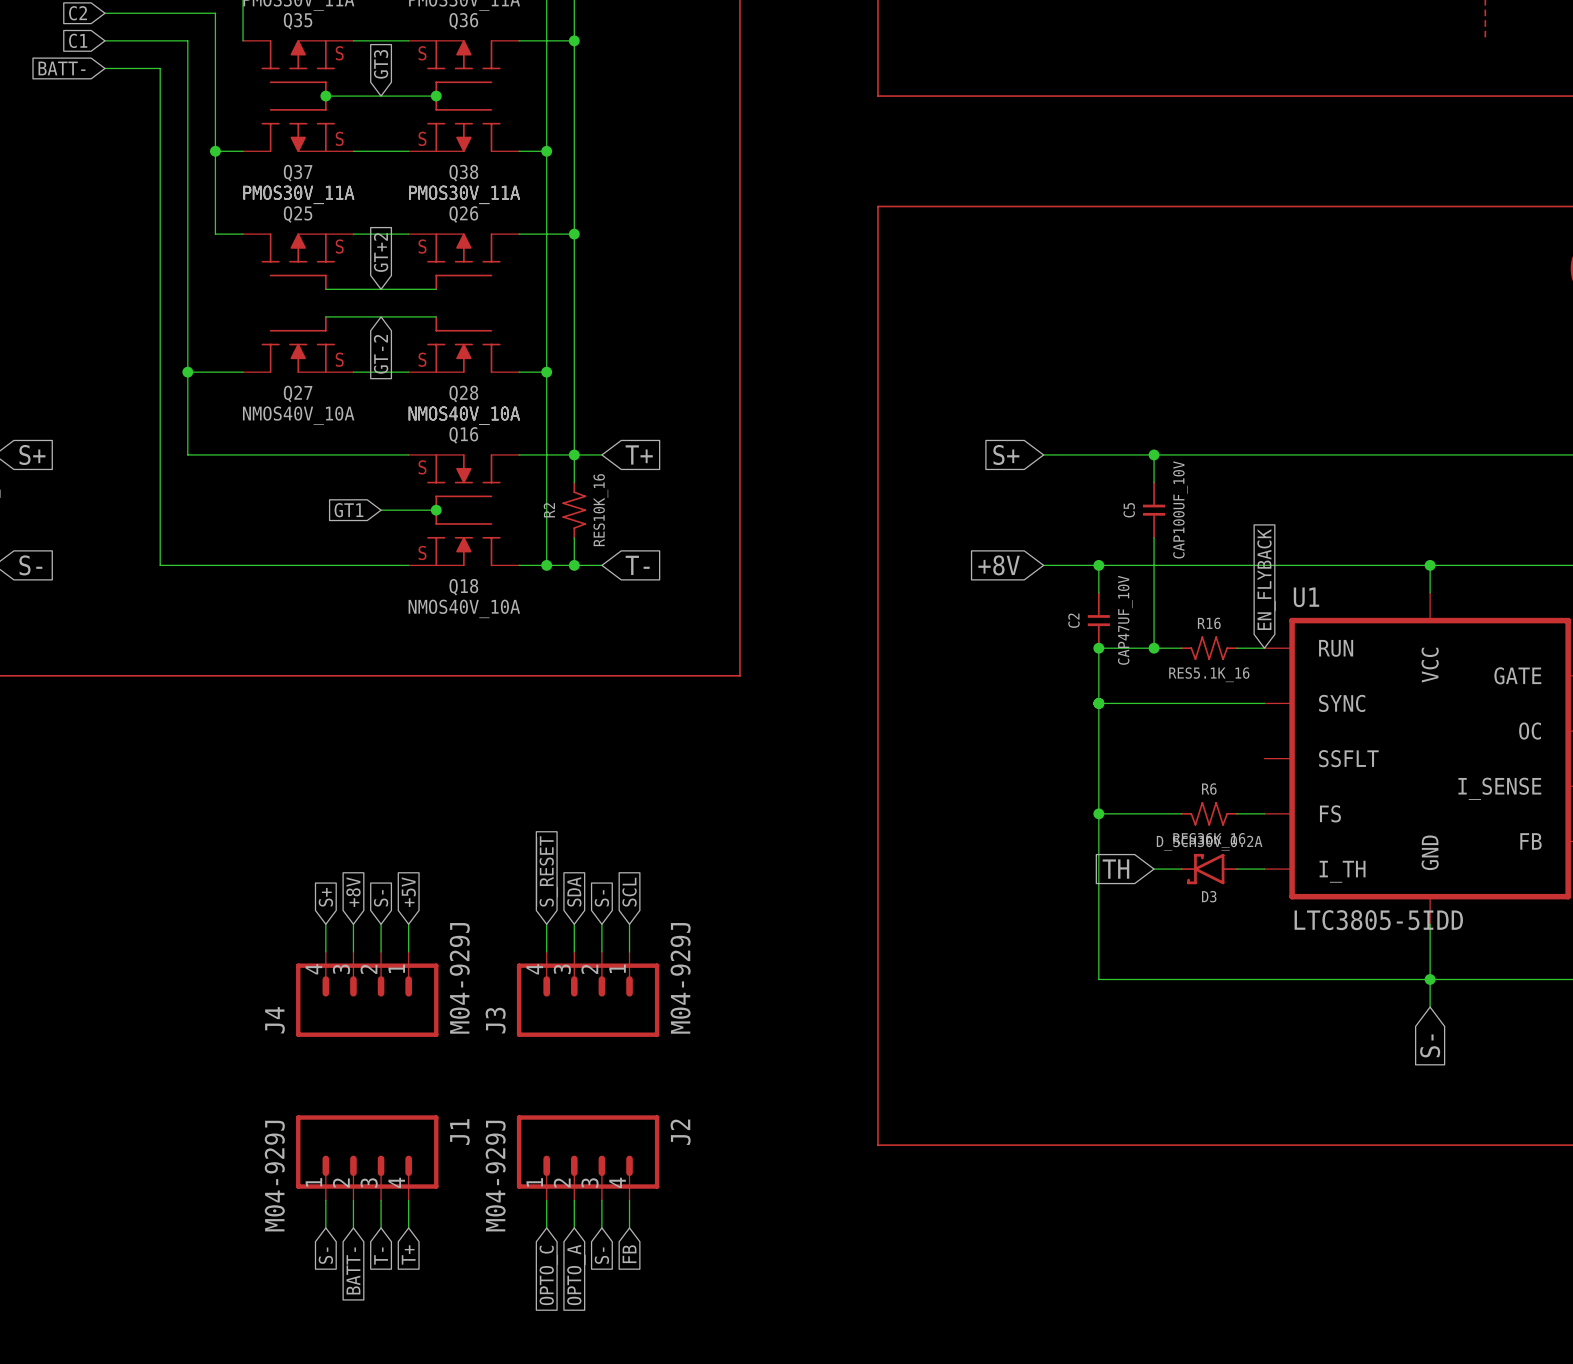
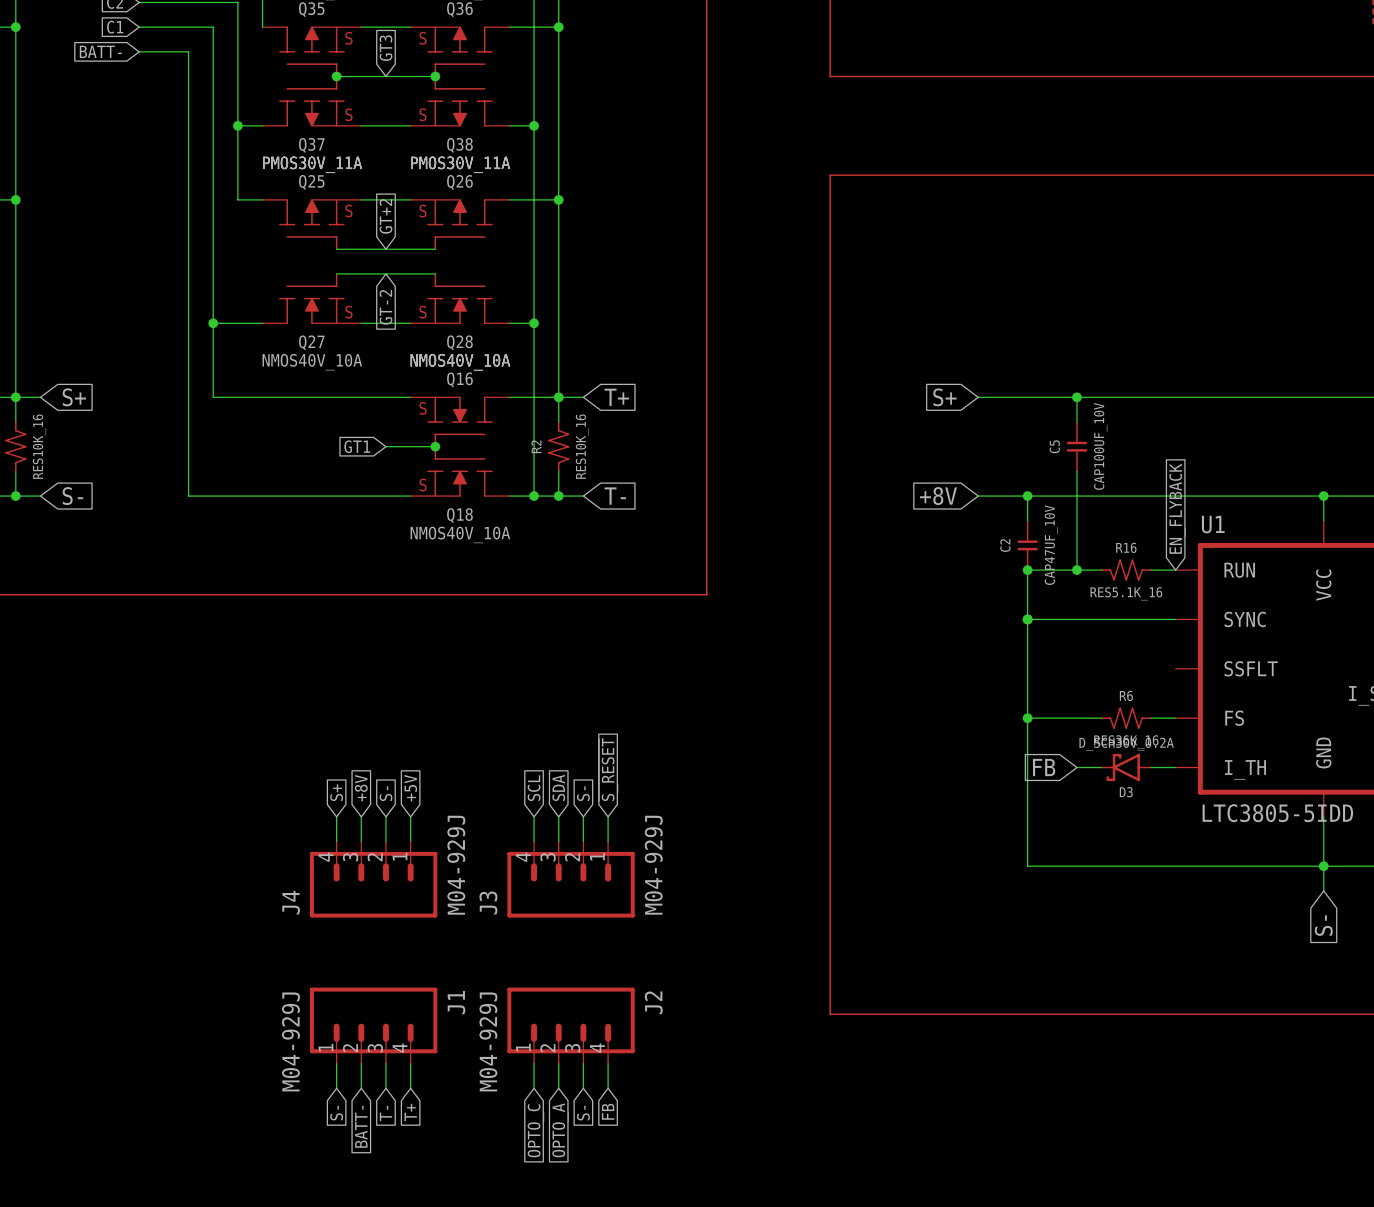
global label: TH (1115, 869) -> FB (1044, 767)
global label: ~{S_RESET} (547, 871) -> SCL (534, 788)
global label: SCL (629, 892) -> ~{S_RESET} (608, 769)

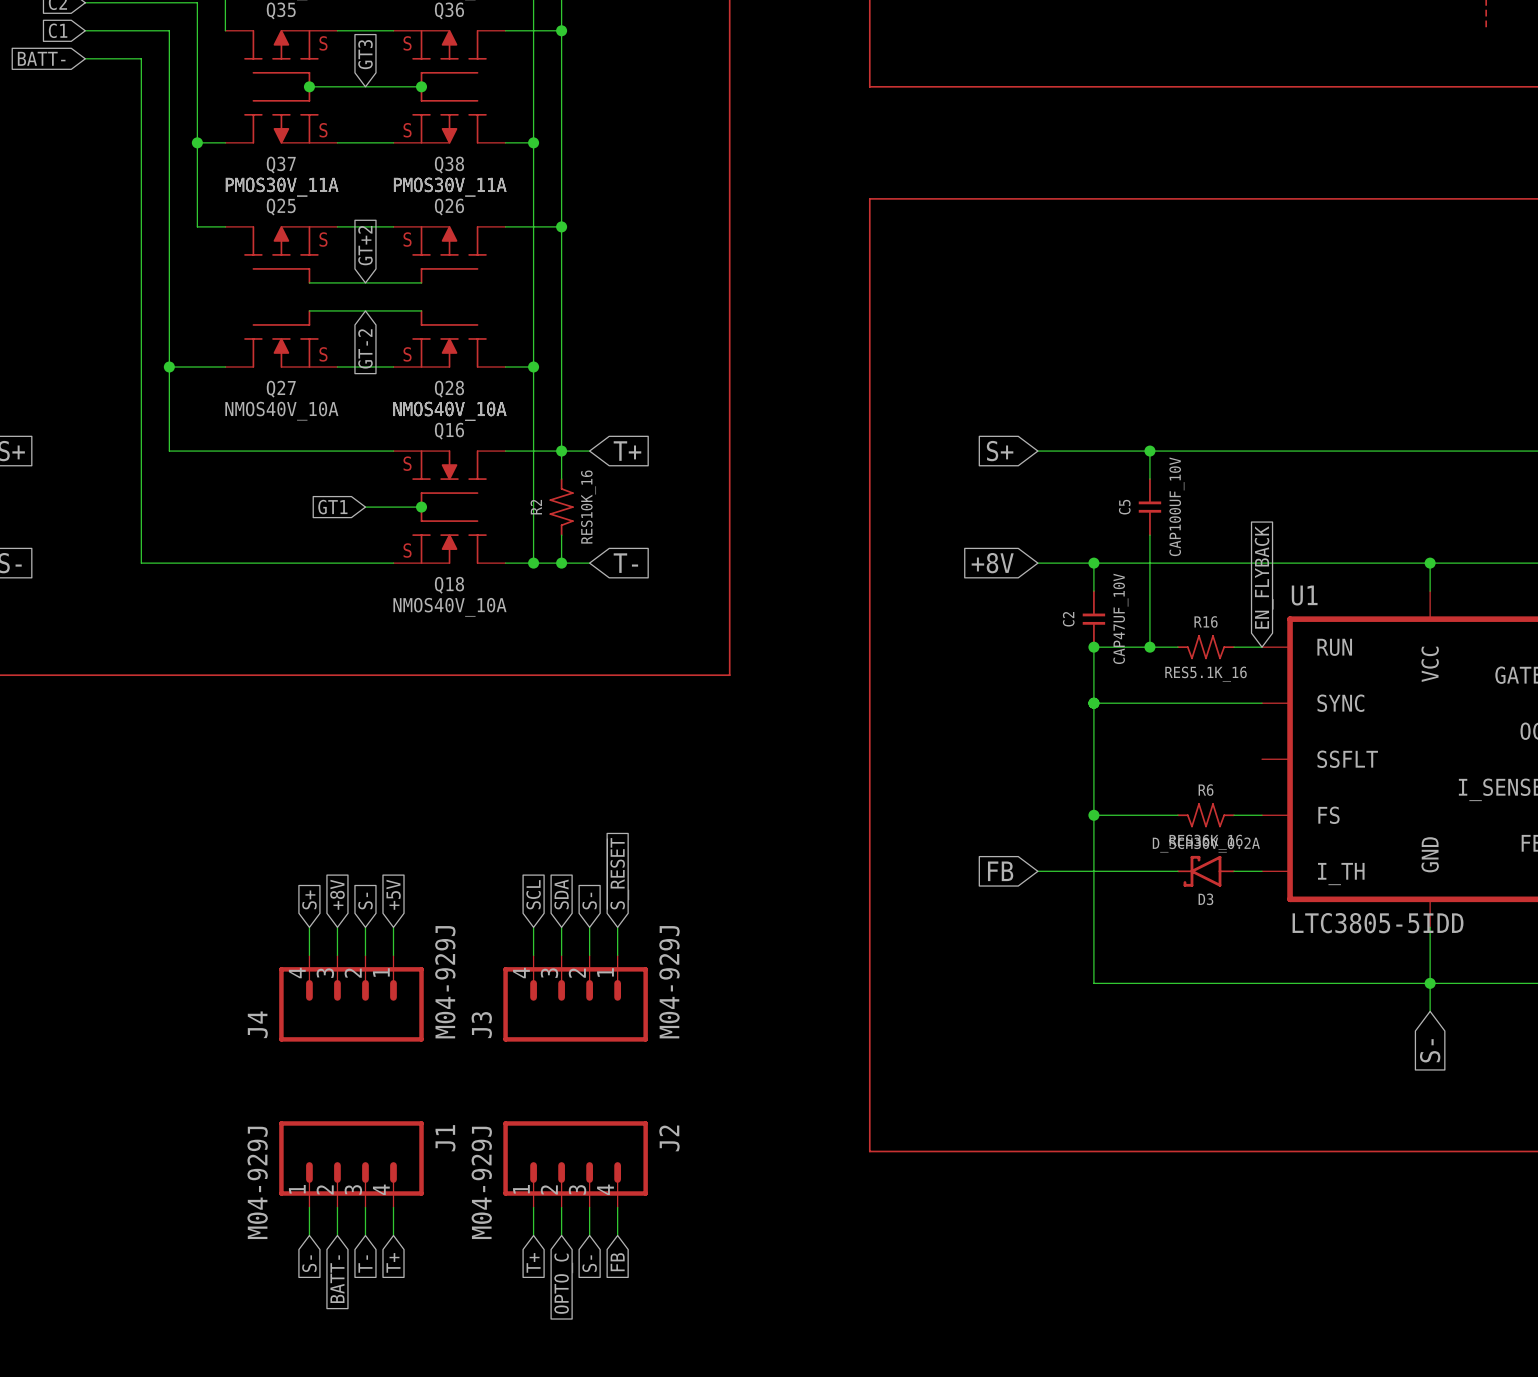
wire: none -> (1037, 871) (1149, 871)
global label position: FB (1044, 767) -> FB (1000, 871)
global label: OPTO_C (535, 1130) -> T+ (533, 1262)
global label: OPTO_A (560, 1130) -> OPTO_C (563, 1283)

